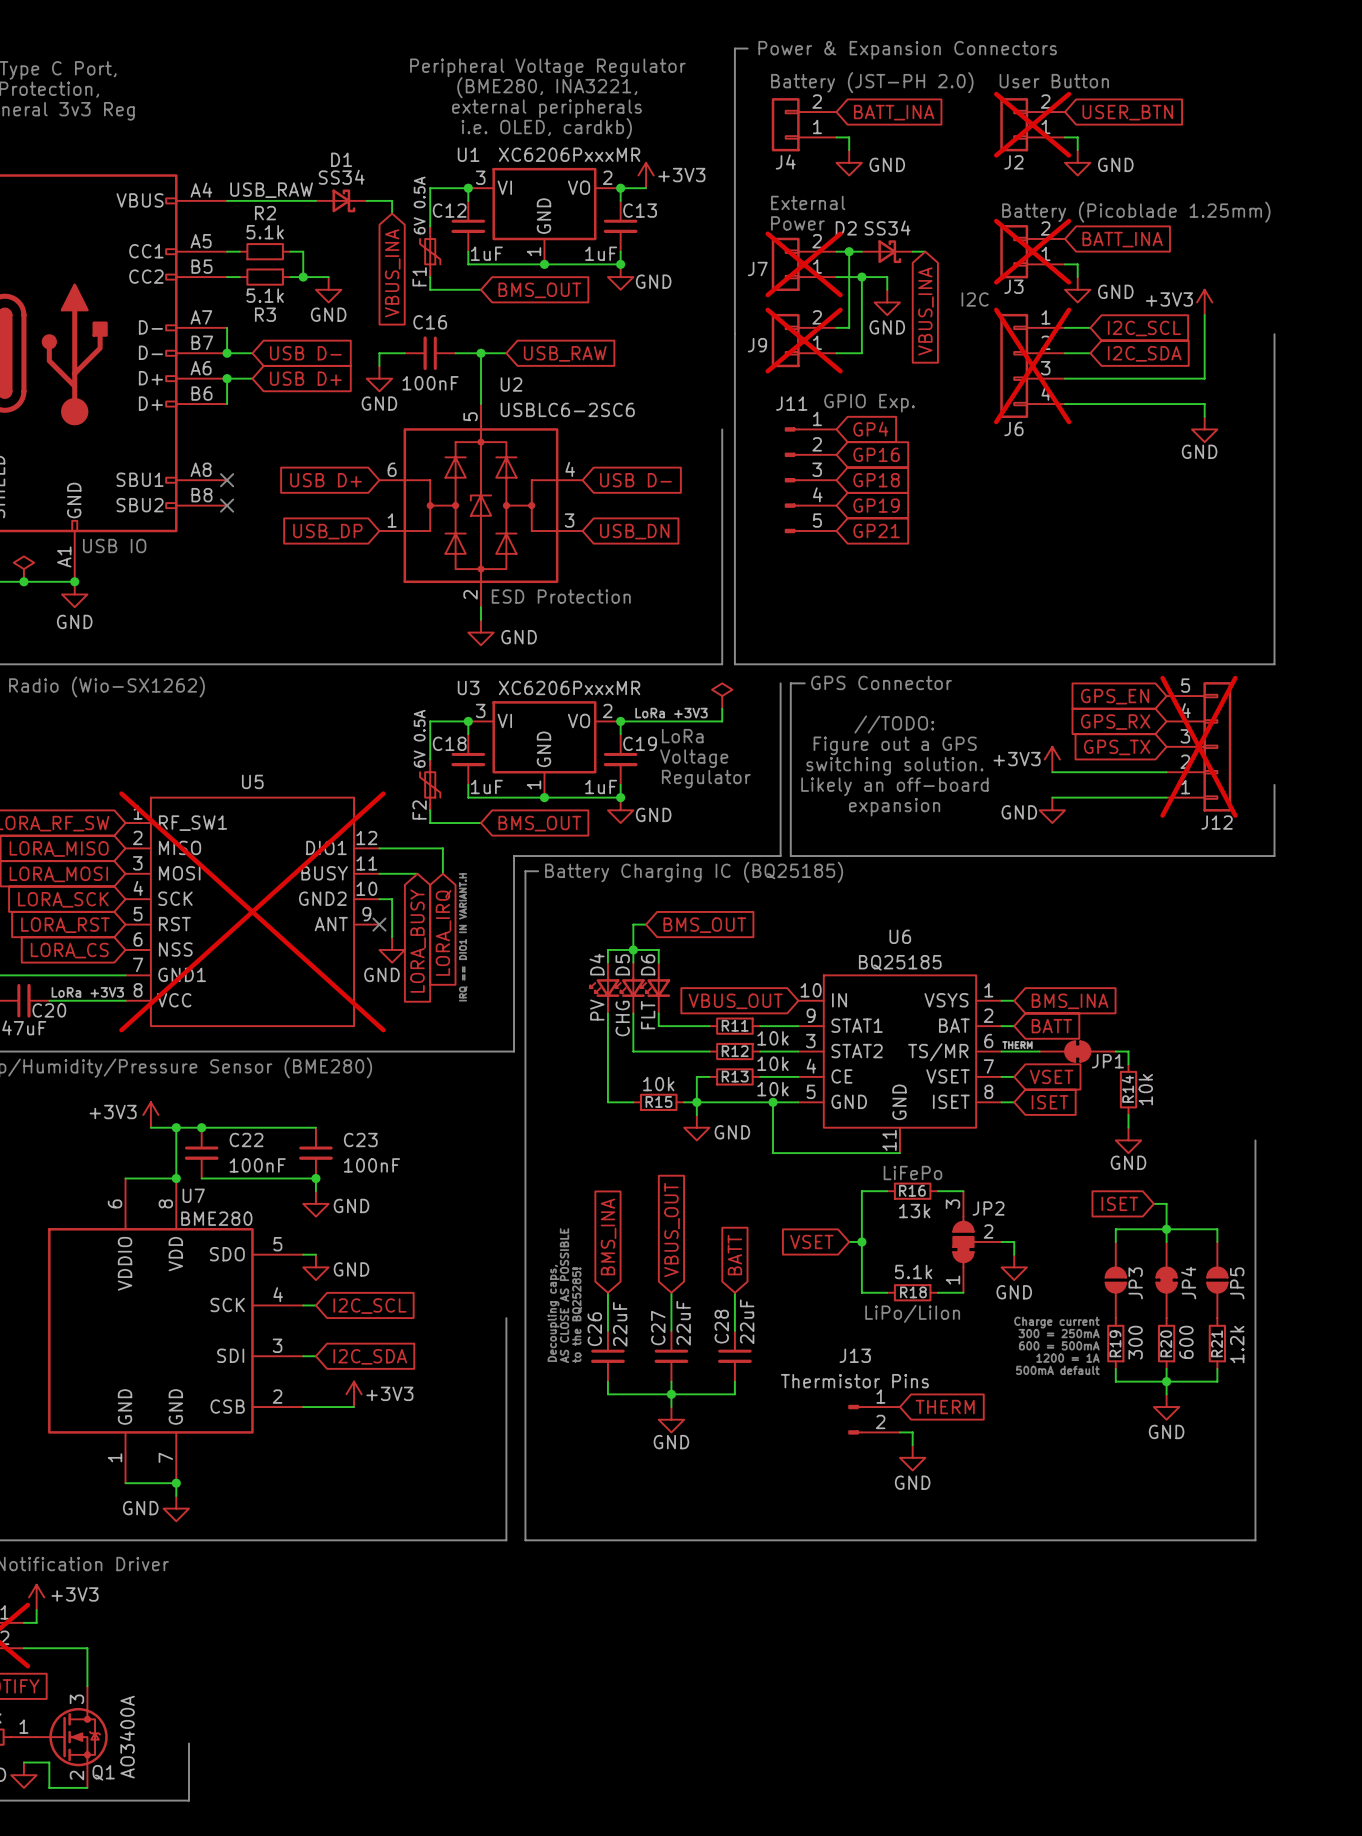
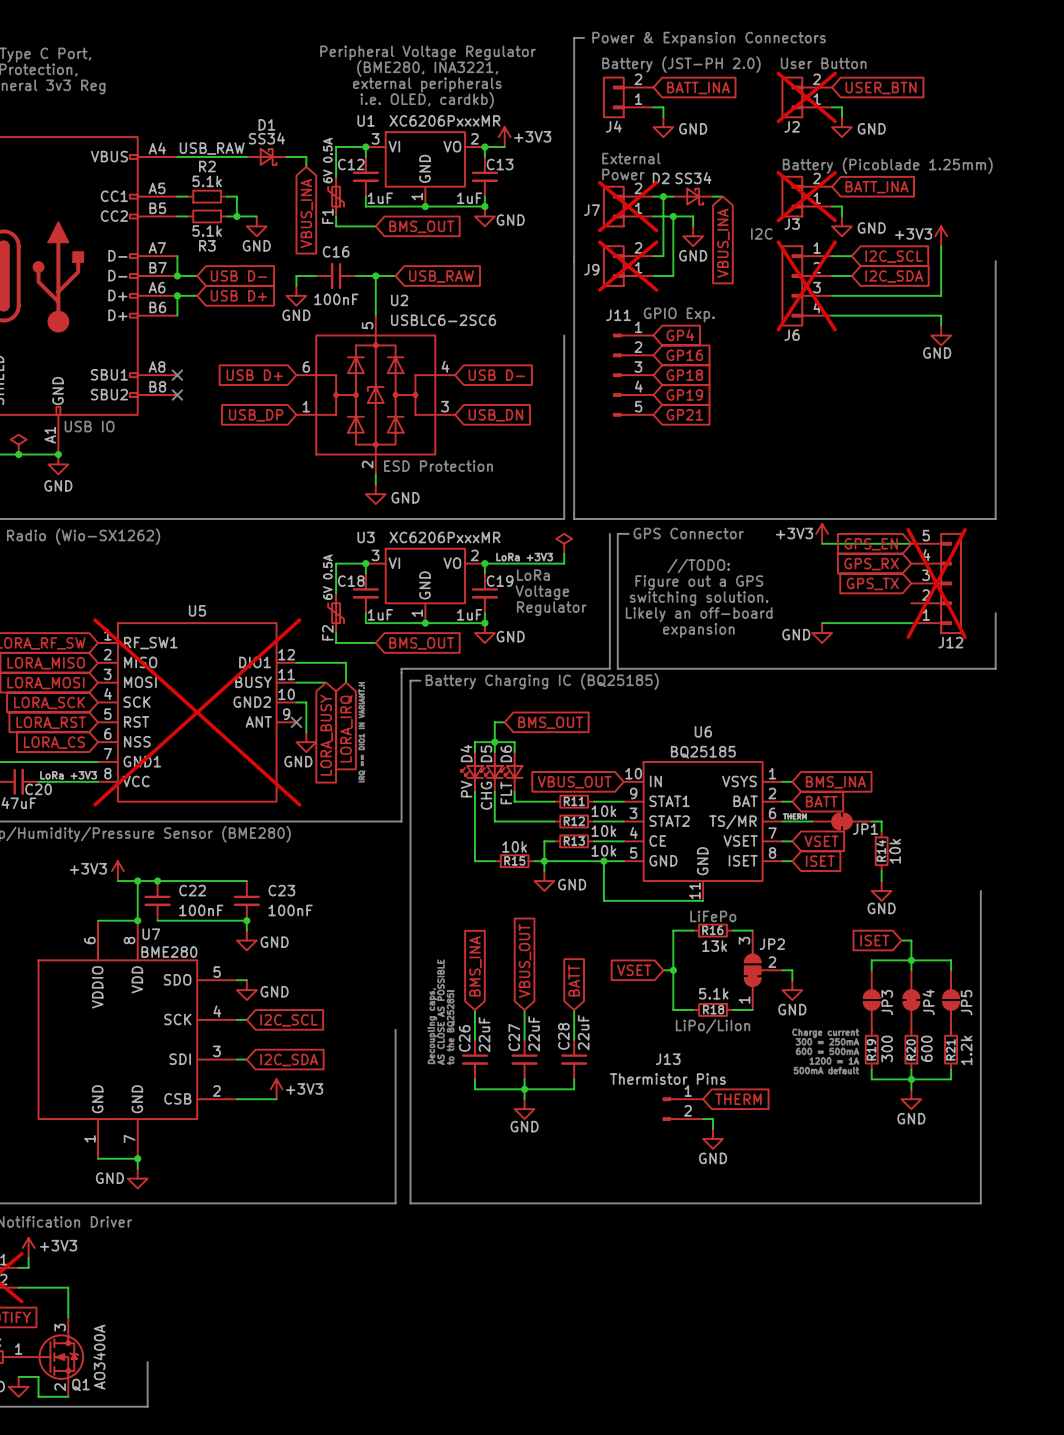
power symbol position: +3V3 (1052, 759) -> +3V3 (822, 533)
wire: (1052, 772) (1166, 772) -> (822, 543) (911, 543)

